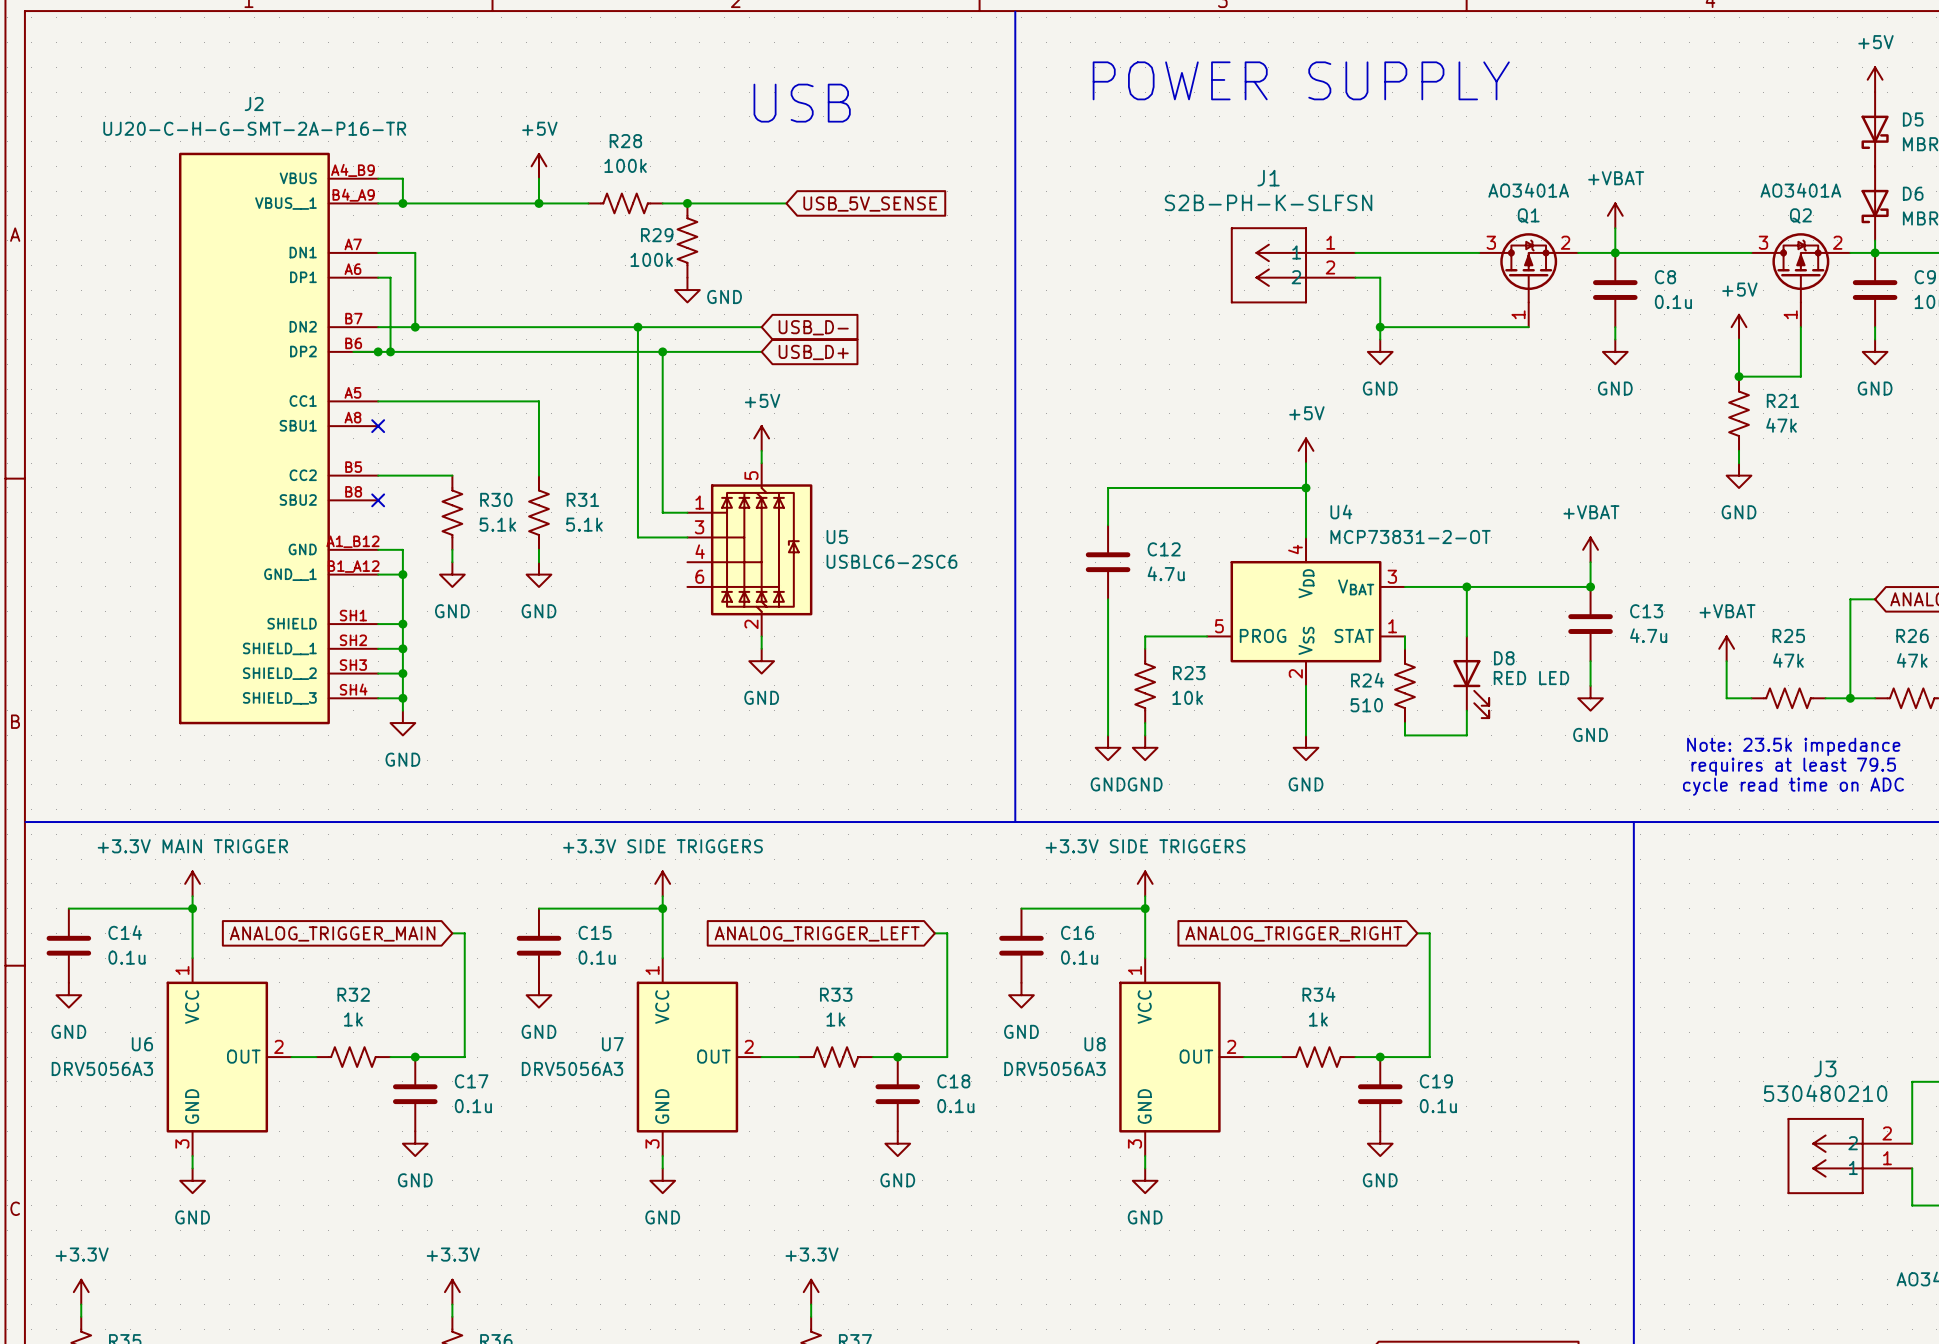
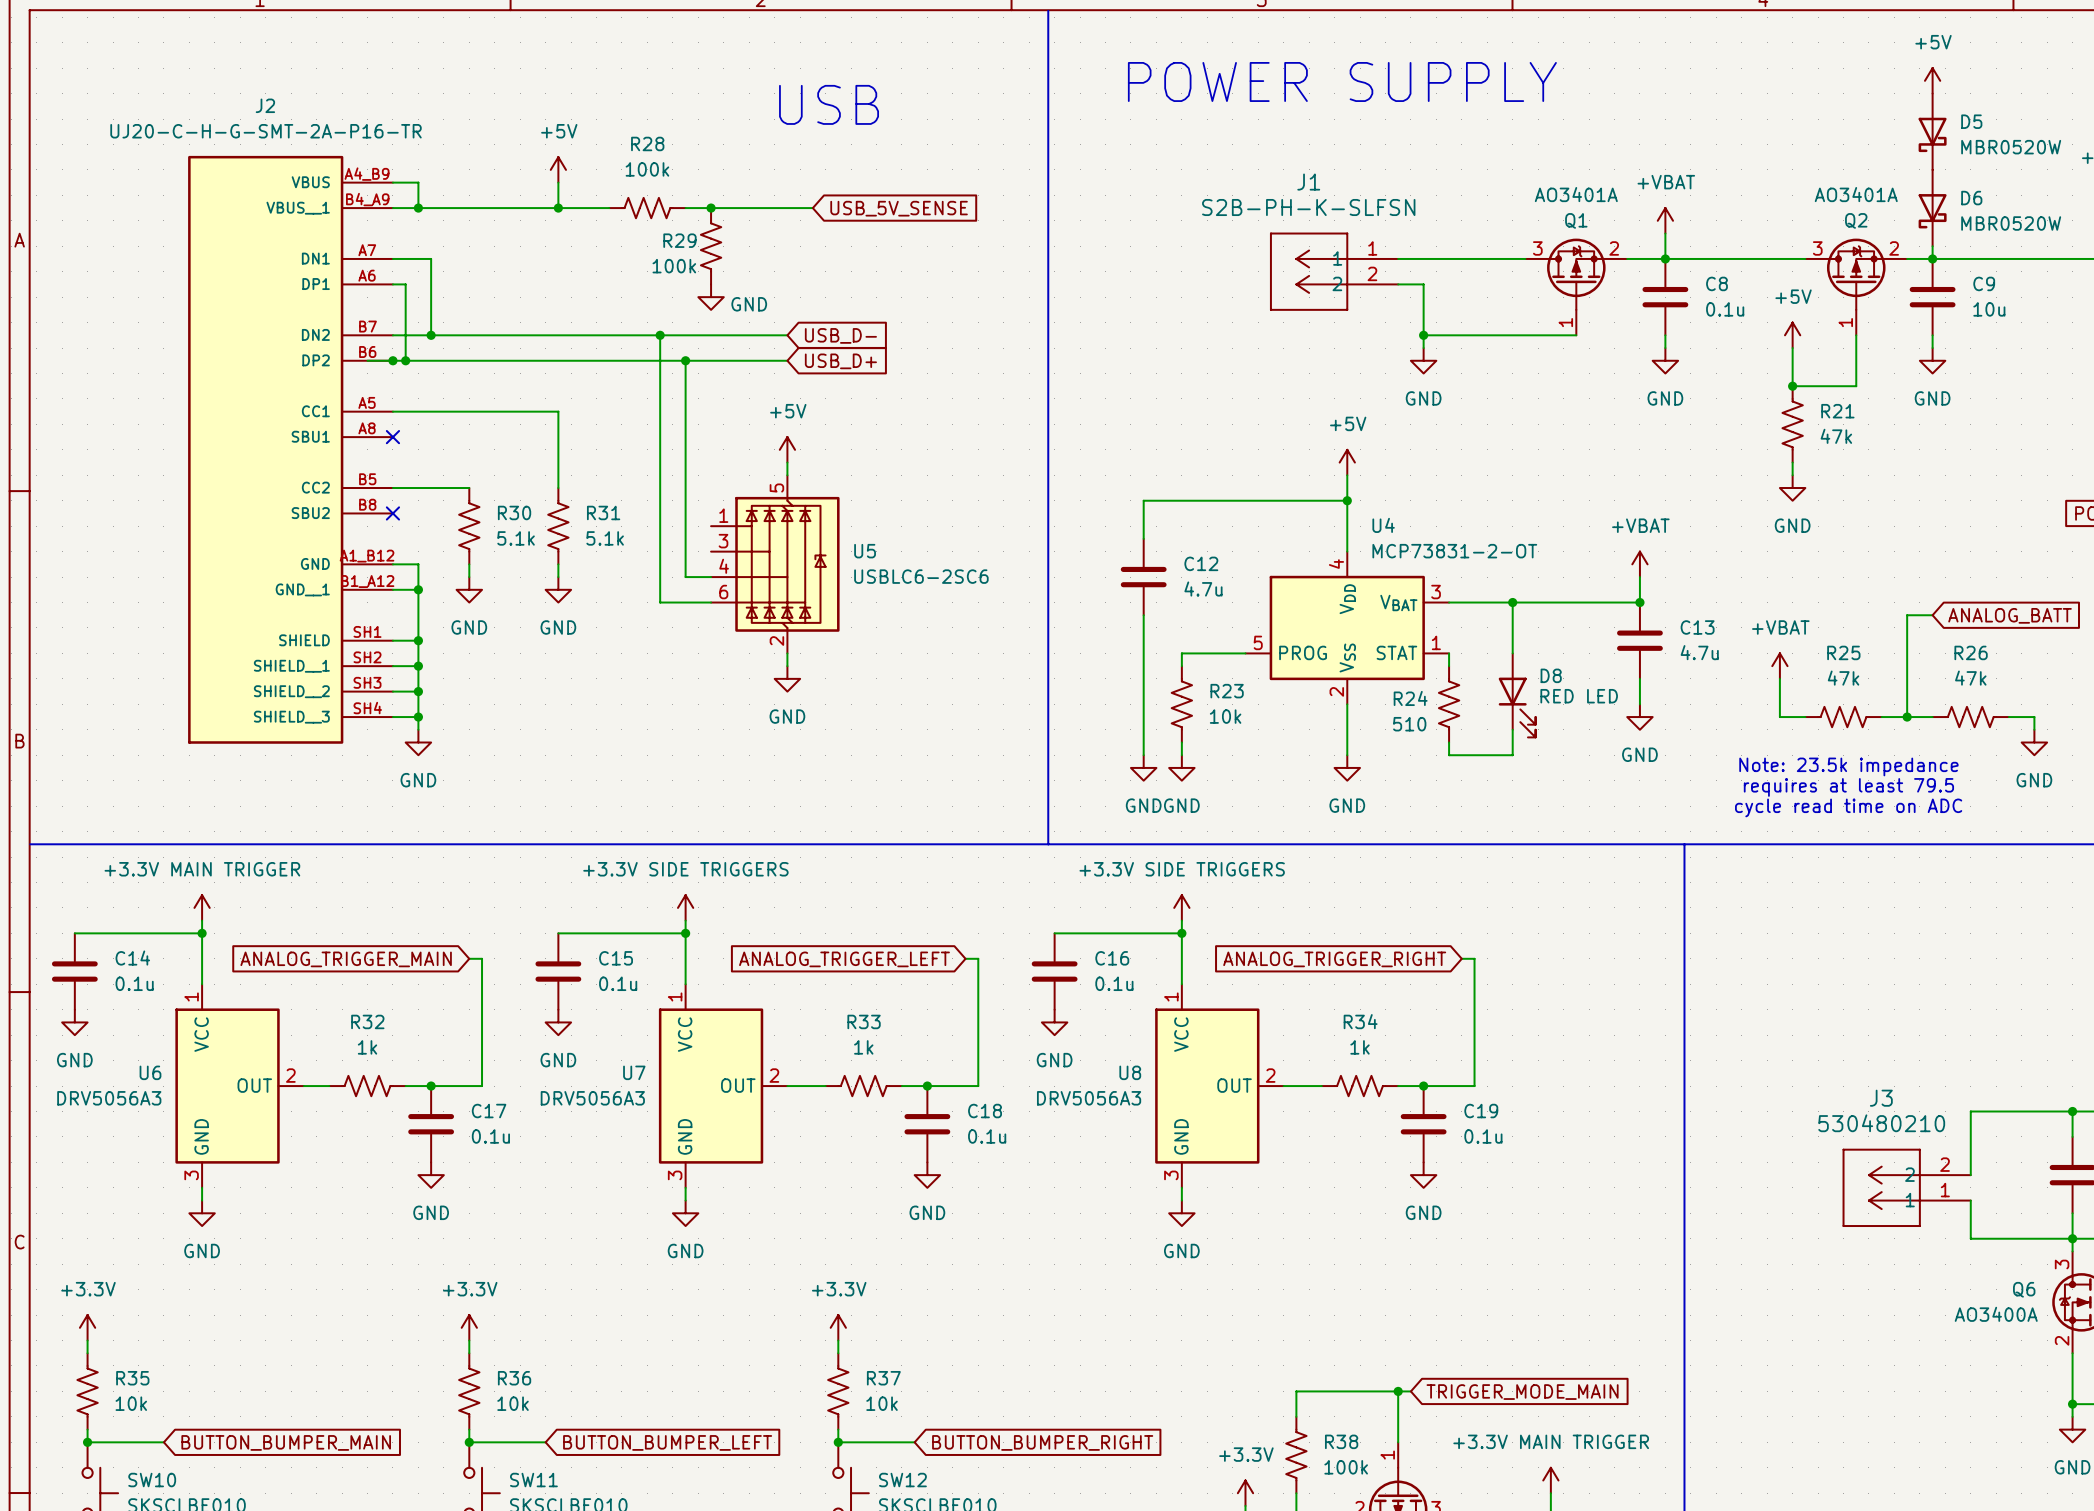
wire: (662, 512) (687, 512) -> (685, 526) (685, 577) (711, 577)
wire: (637, 537) (687, 537) -> (660, 551) (660, 602) (711, 602)

